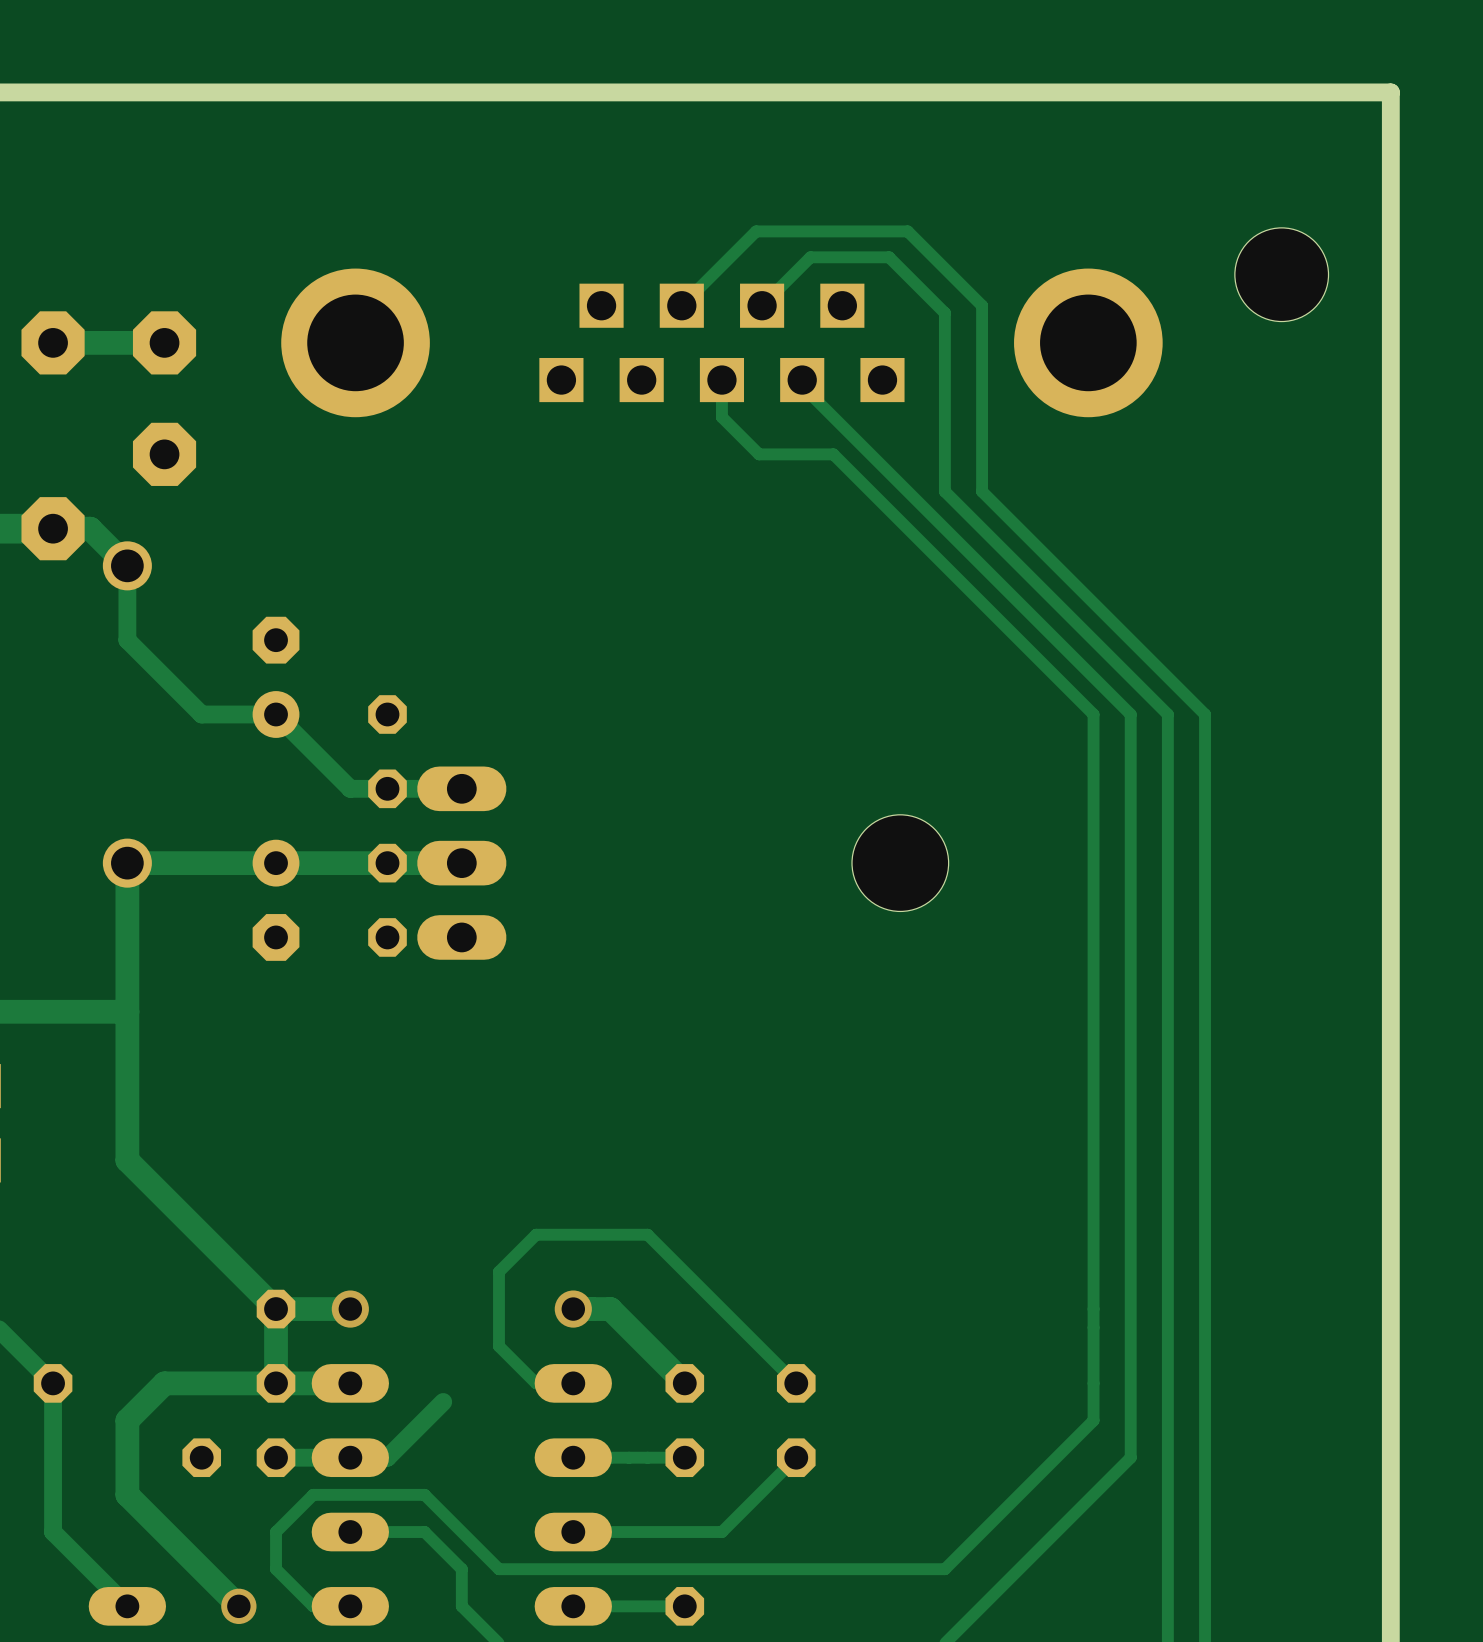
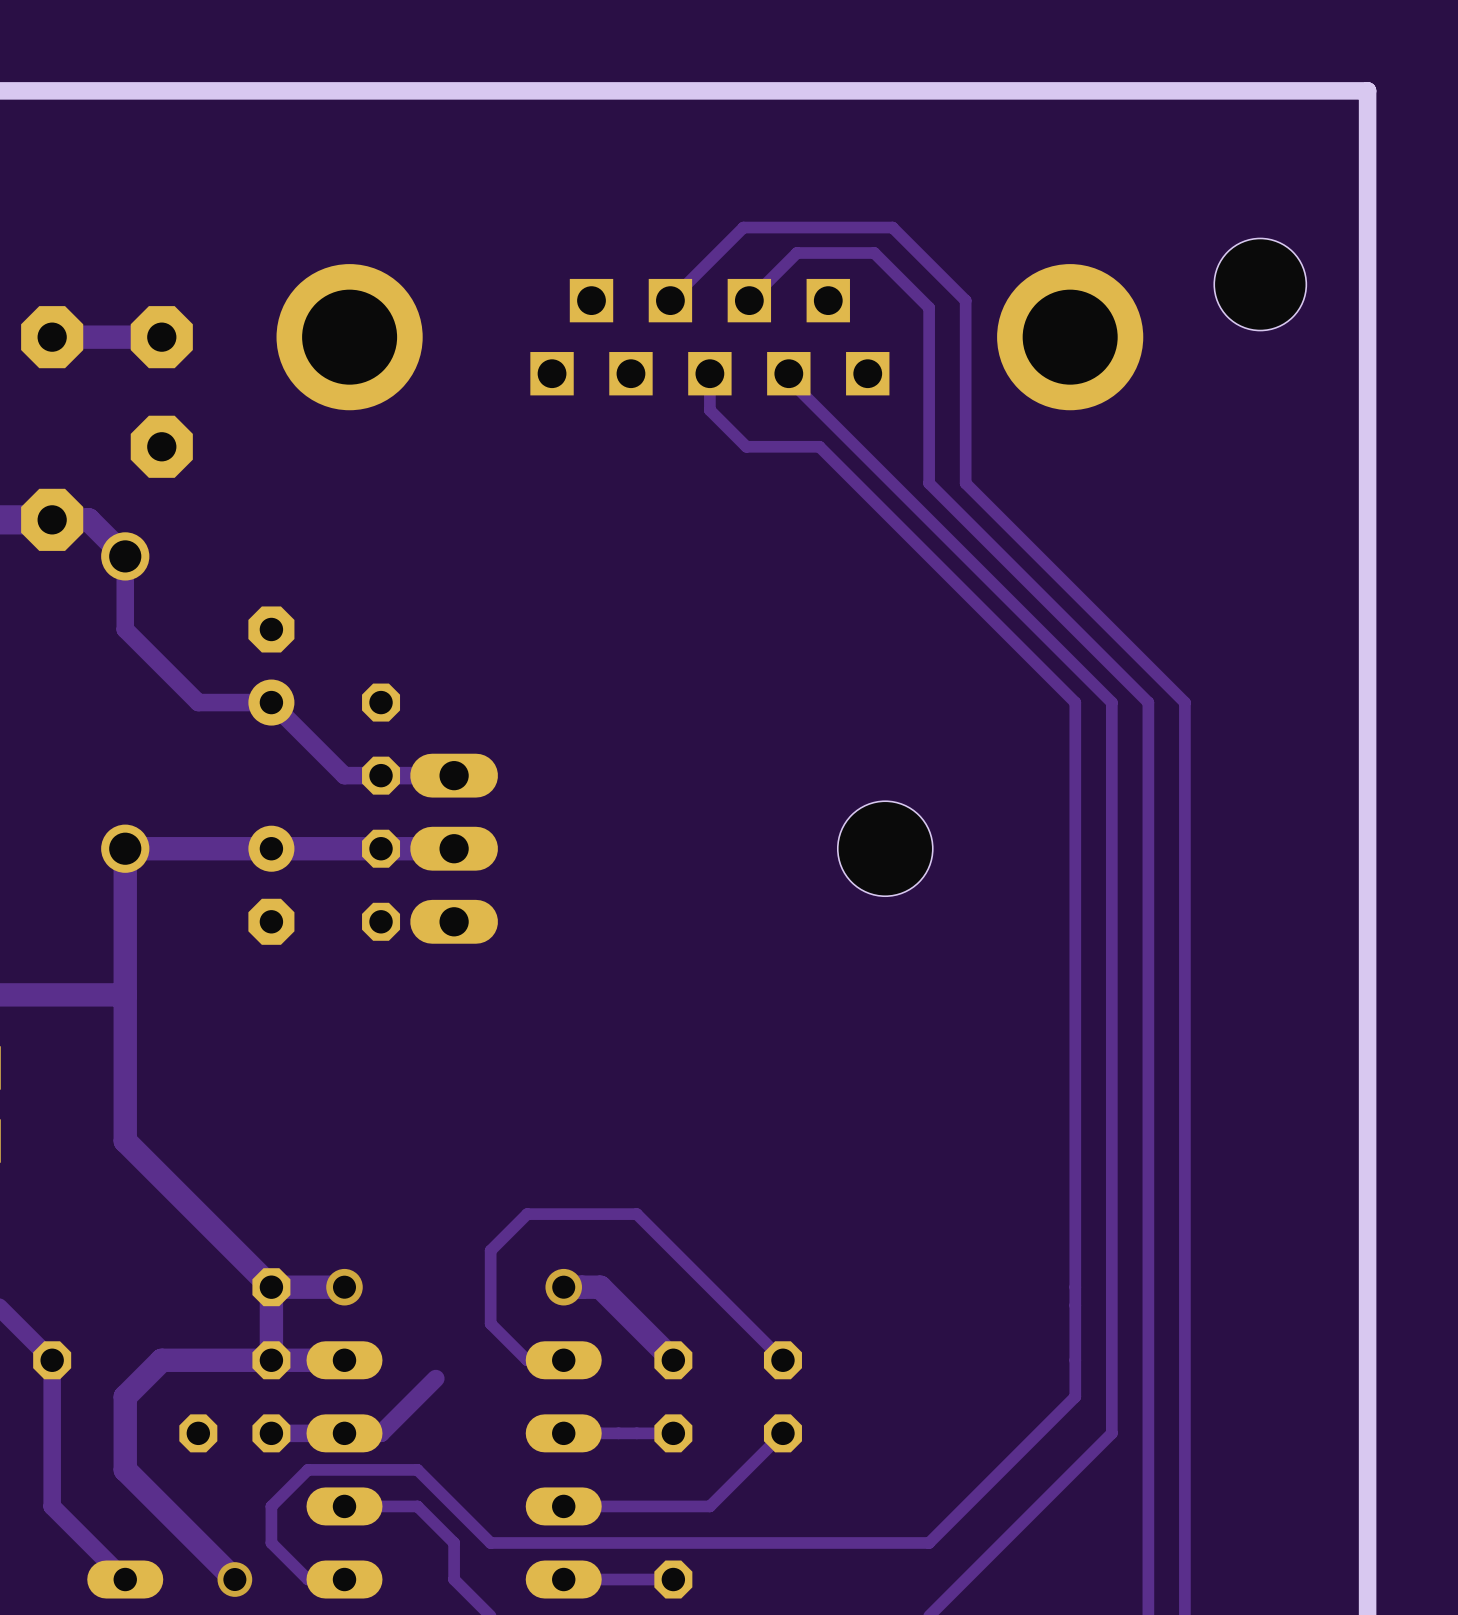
hole position: (1281, 274) -> (1260, 284)

